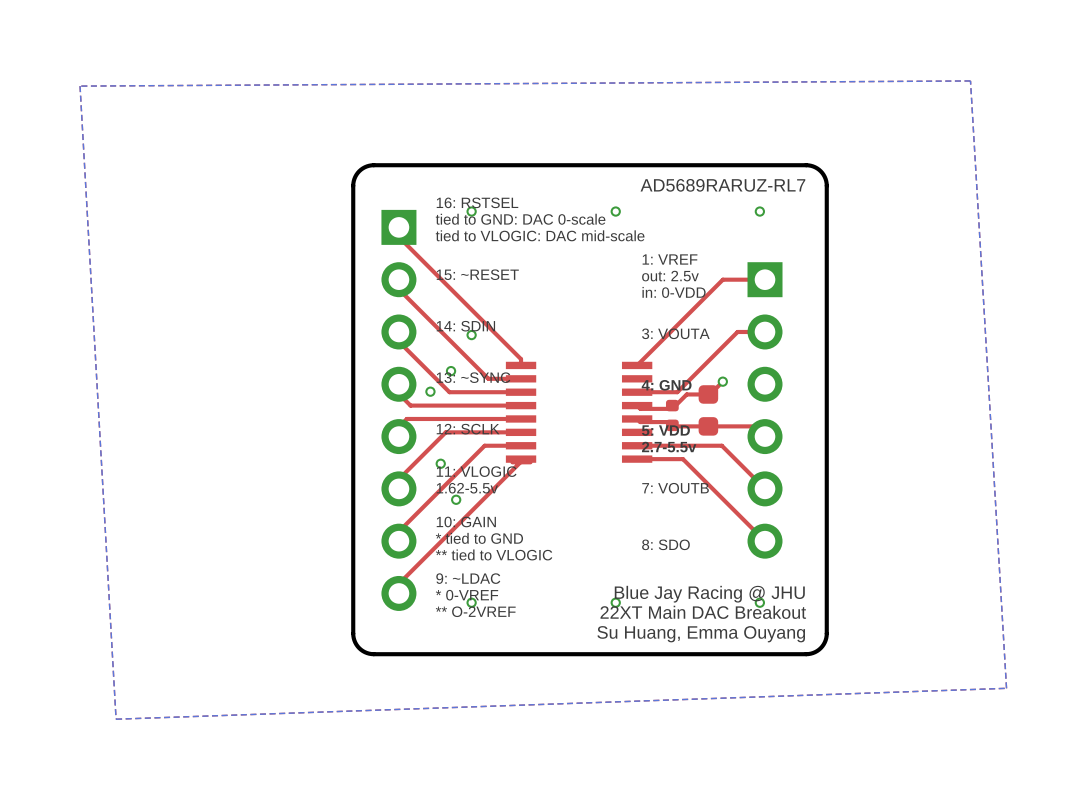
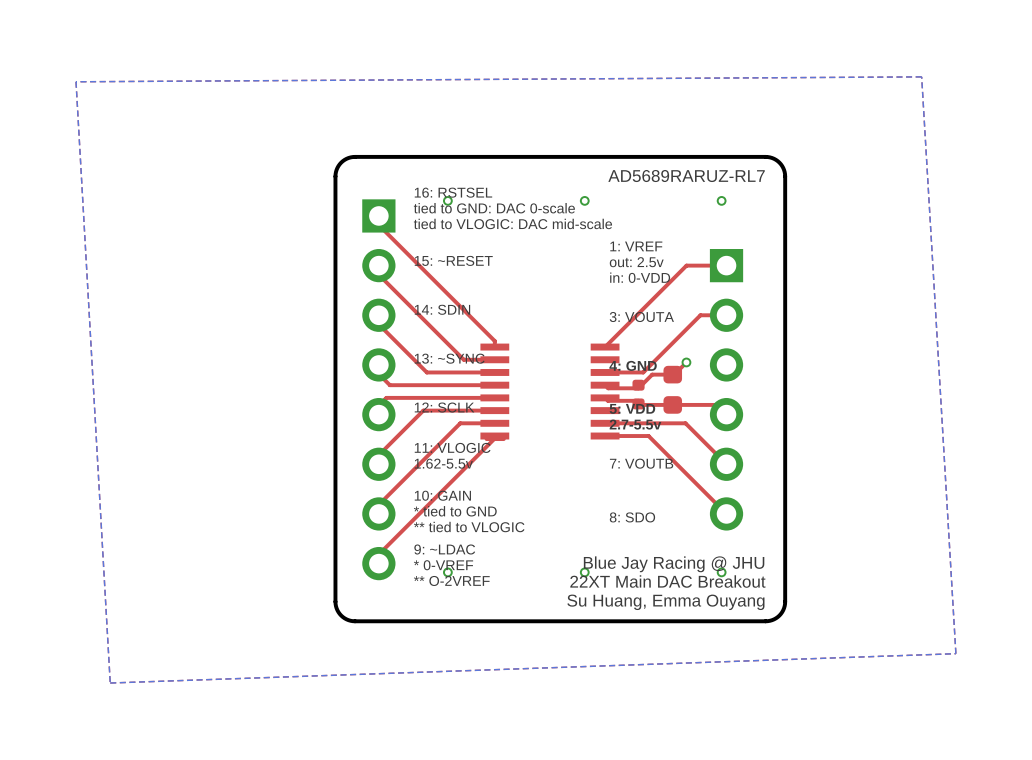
via: (471, 335) -> none
via: (451, 371) -> none
via: (430, 391) -> none
via: (440, 463) -> none
via: (456, 499) -> none

